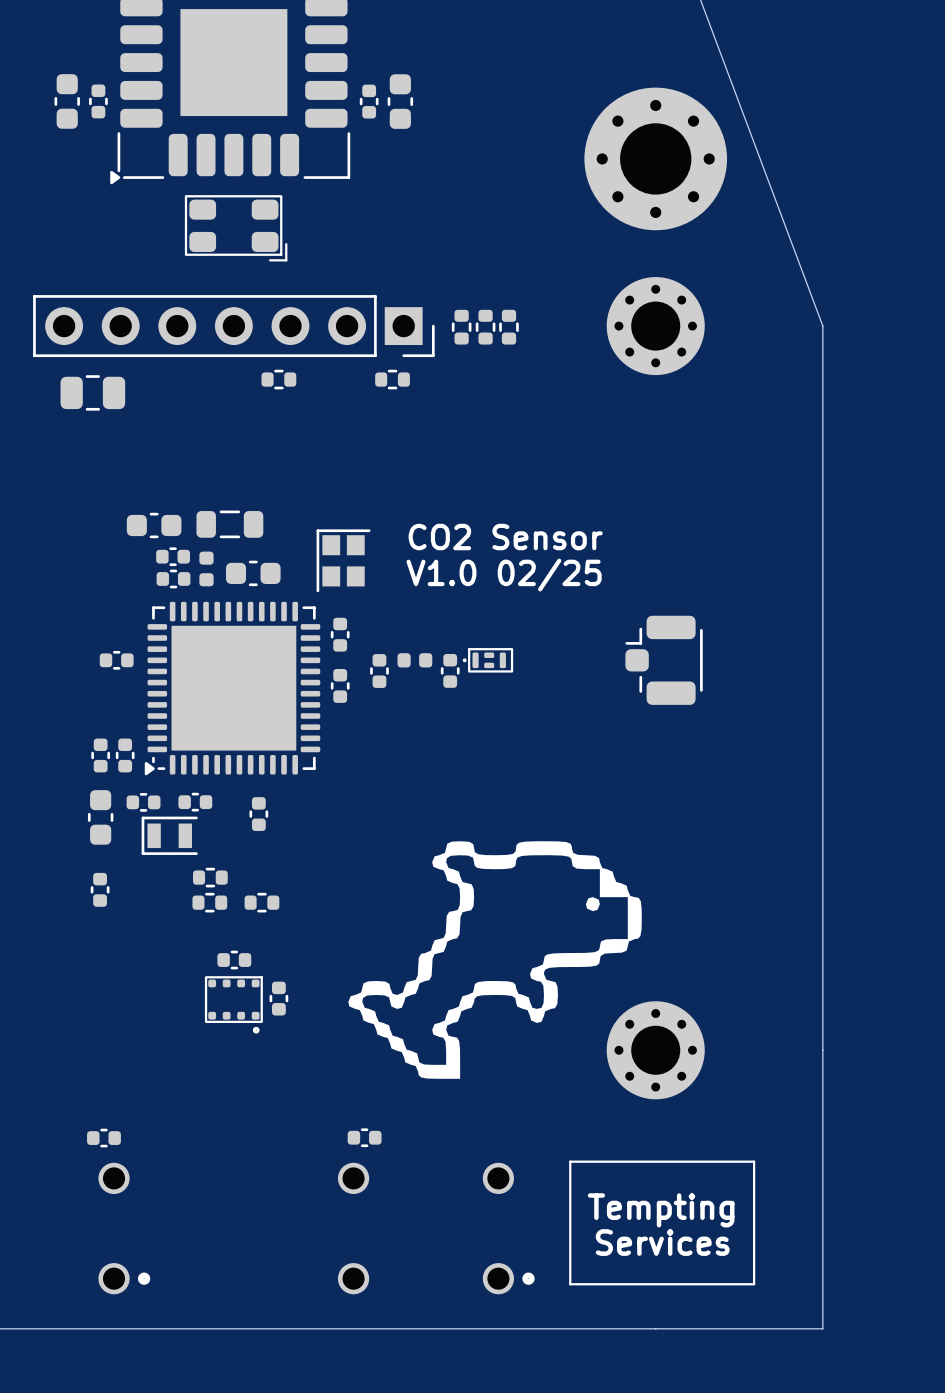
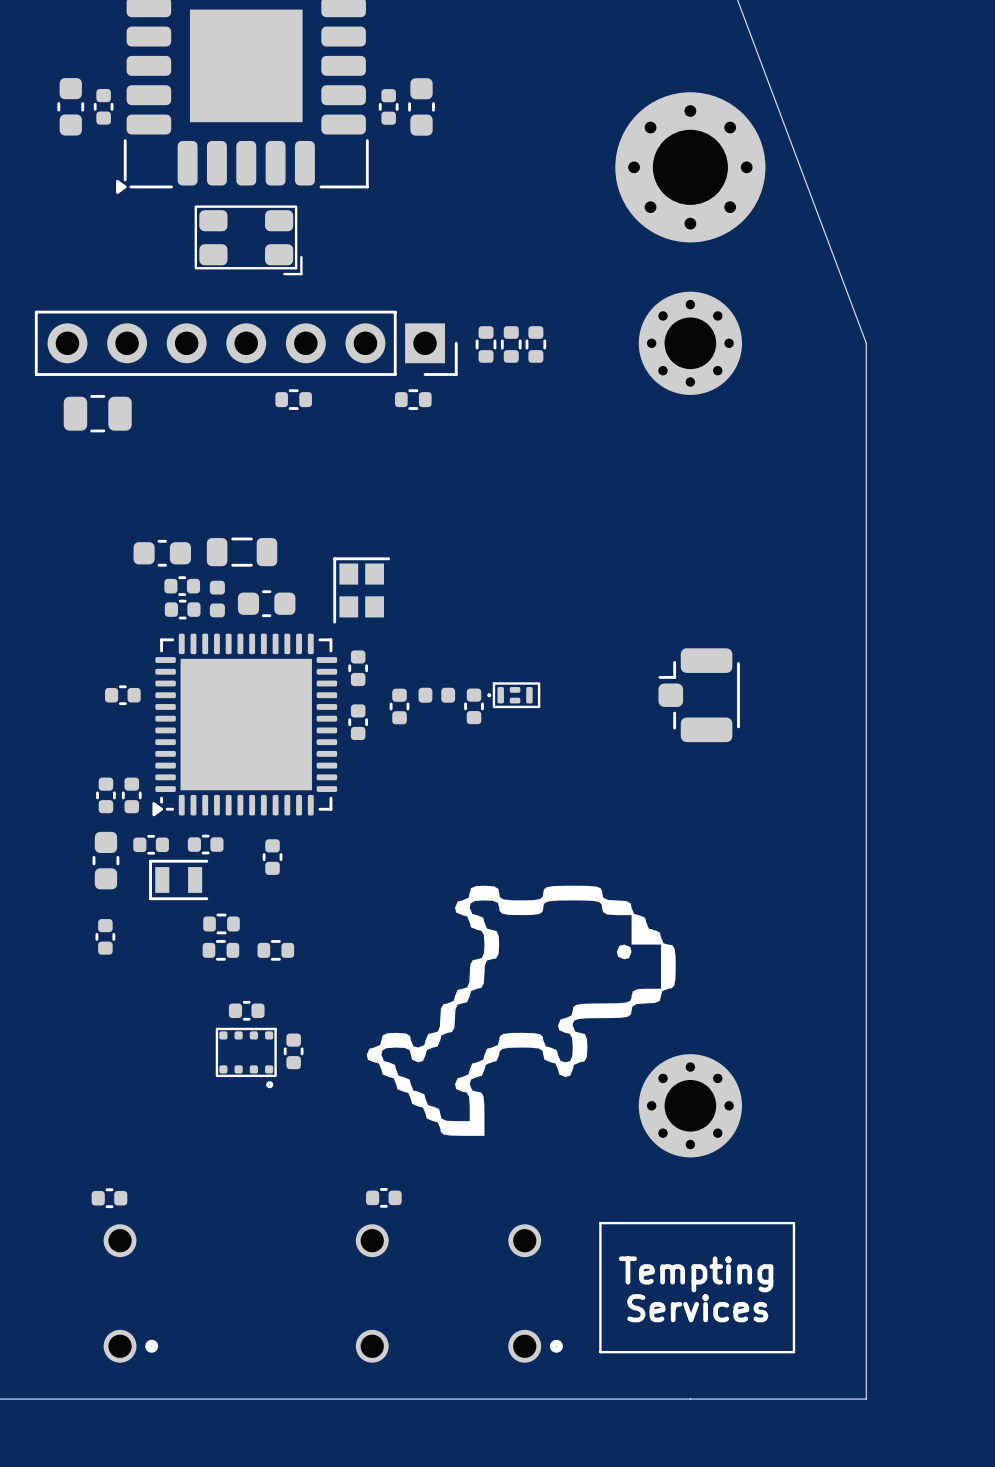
text: CO2 Sensor (505, 537) -> none
text: V1.0 02/25 (504, 575) -> none

